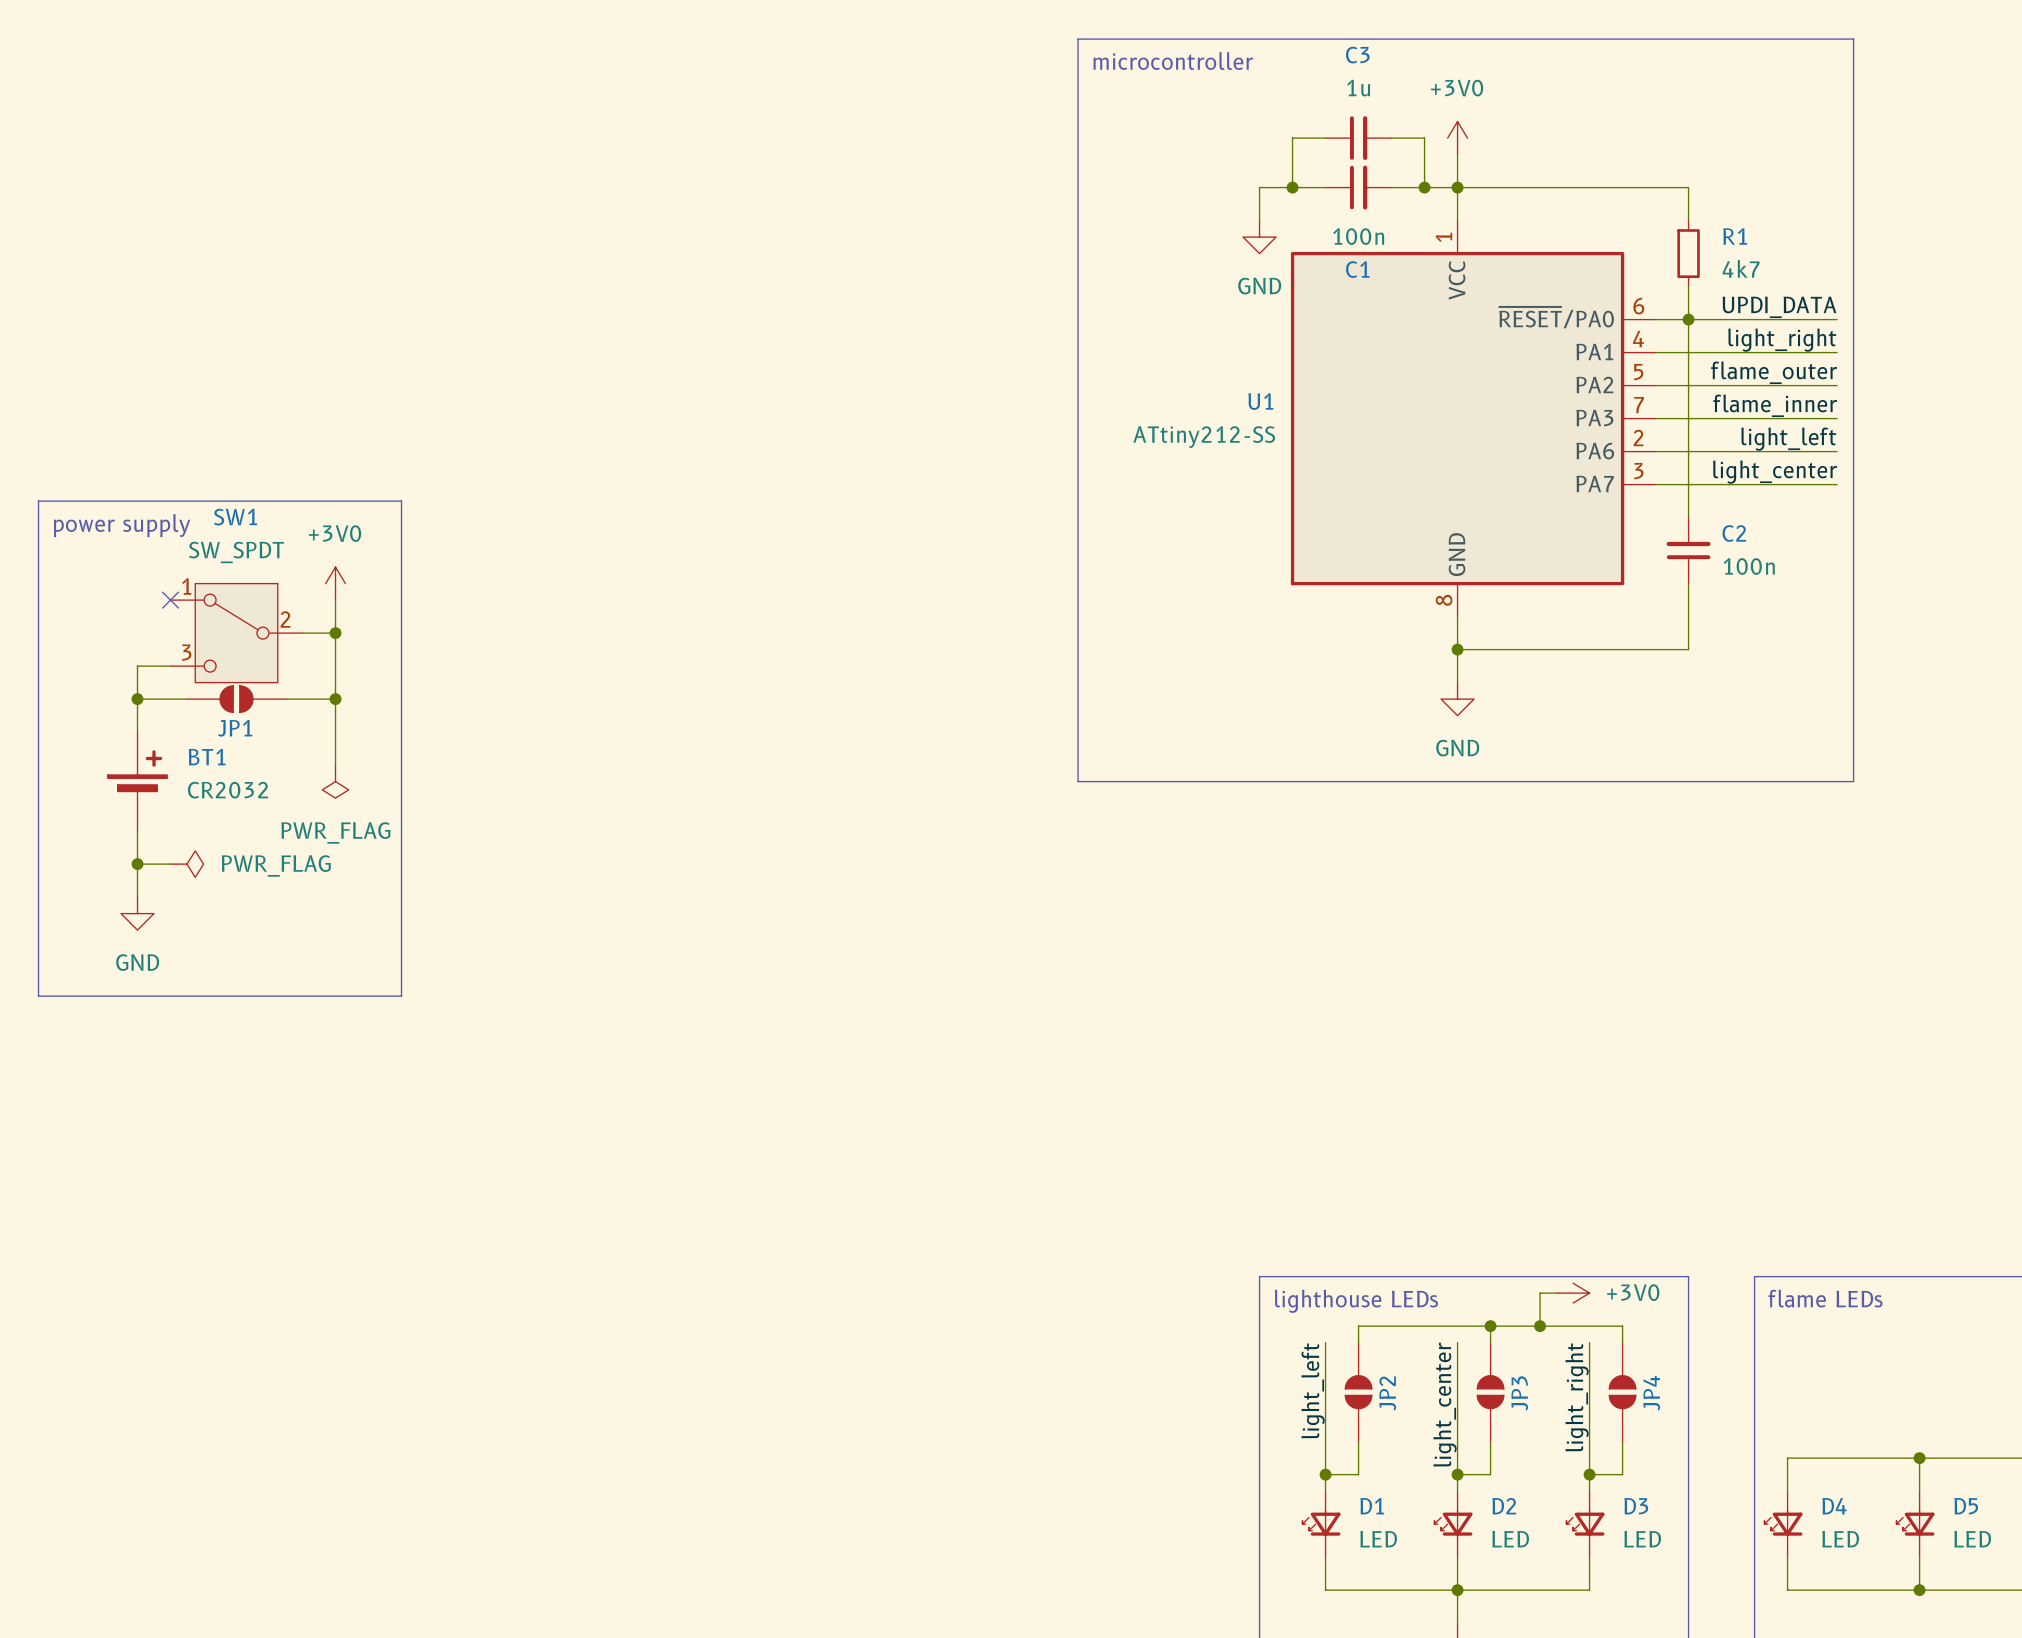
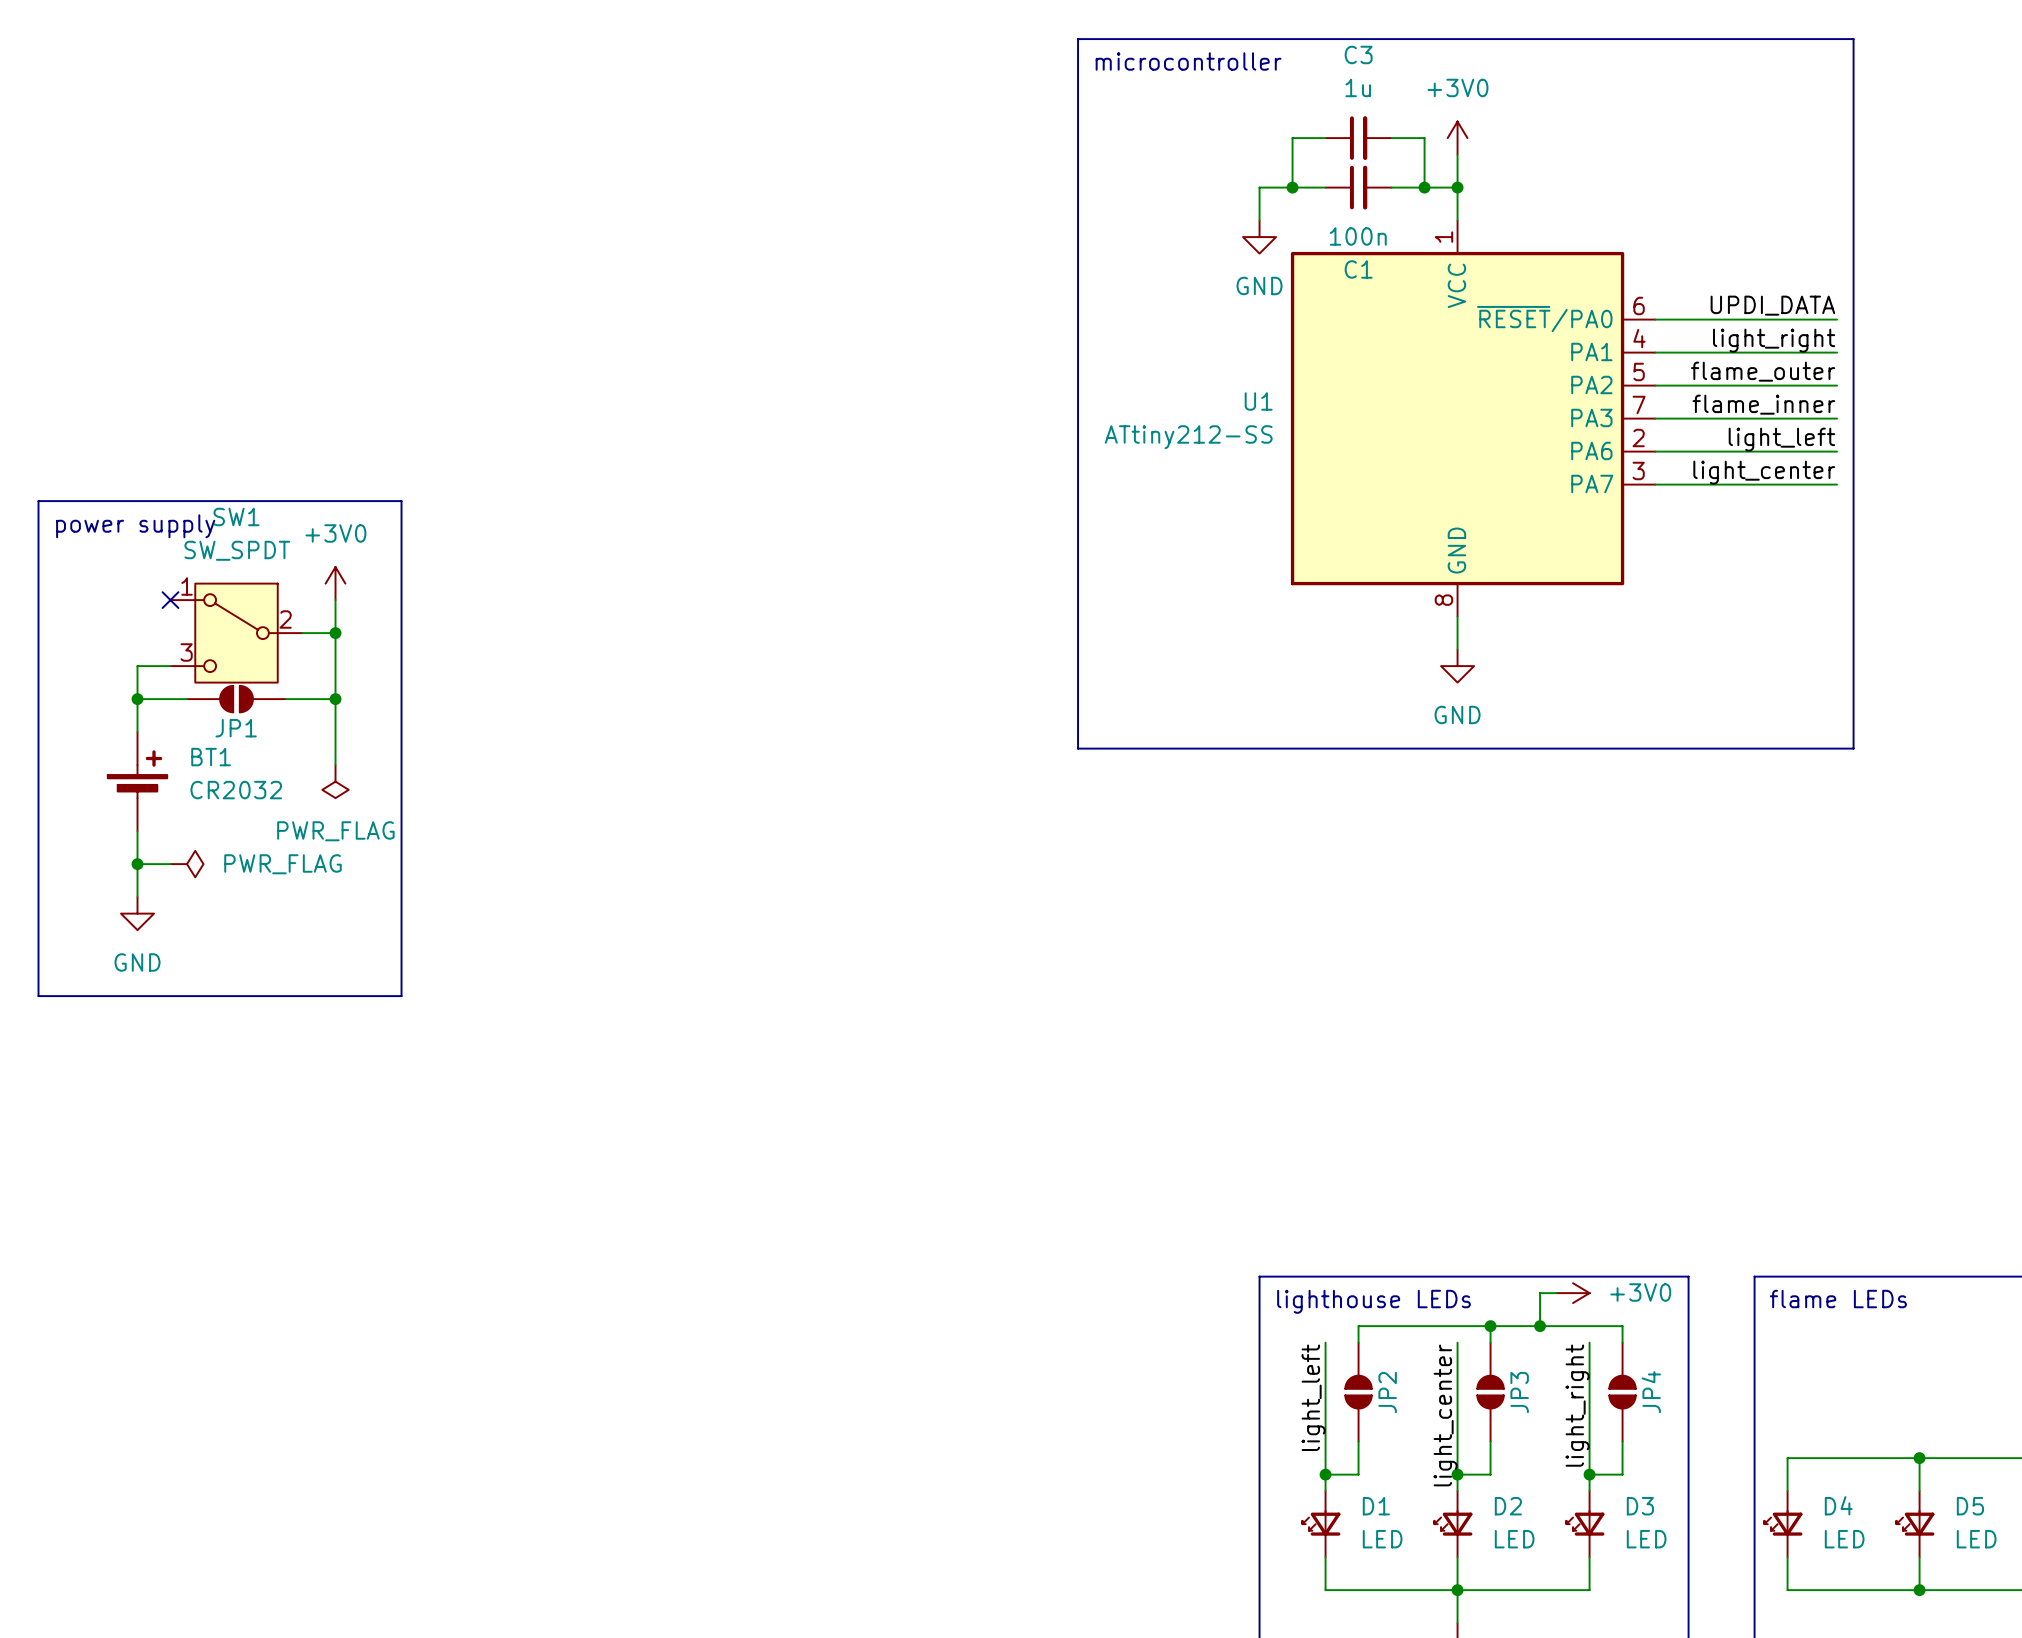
wire: (1457, 187) (1688, 187) (1688, 220) -> none
R1: 4k7 (1688, 253) -> none
wire: (1688, 286) (1688, 517) -> none
junction: (1688, 319) -> none
C2: 100n (1688, 550) -> none
wire: (1688, 583) (1688, 649) (1457, 649) (1457, 682) -> none
junction: (1457, 649) -> none
power symbol position: GND (1457, 699) -> GND (1457, 666)
line: (1078, 748) (1078, 781) (1853, 781) (1853, 748) -> (1078, 748) (1853, 748)

